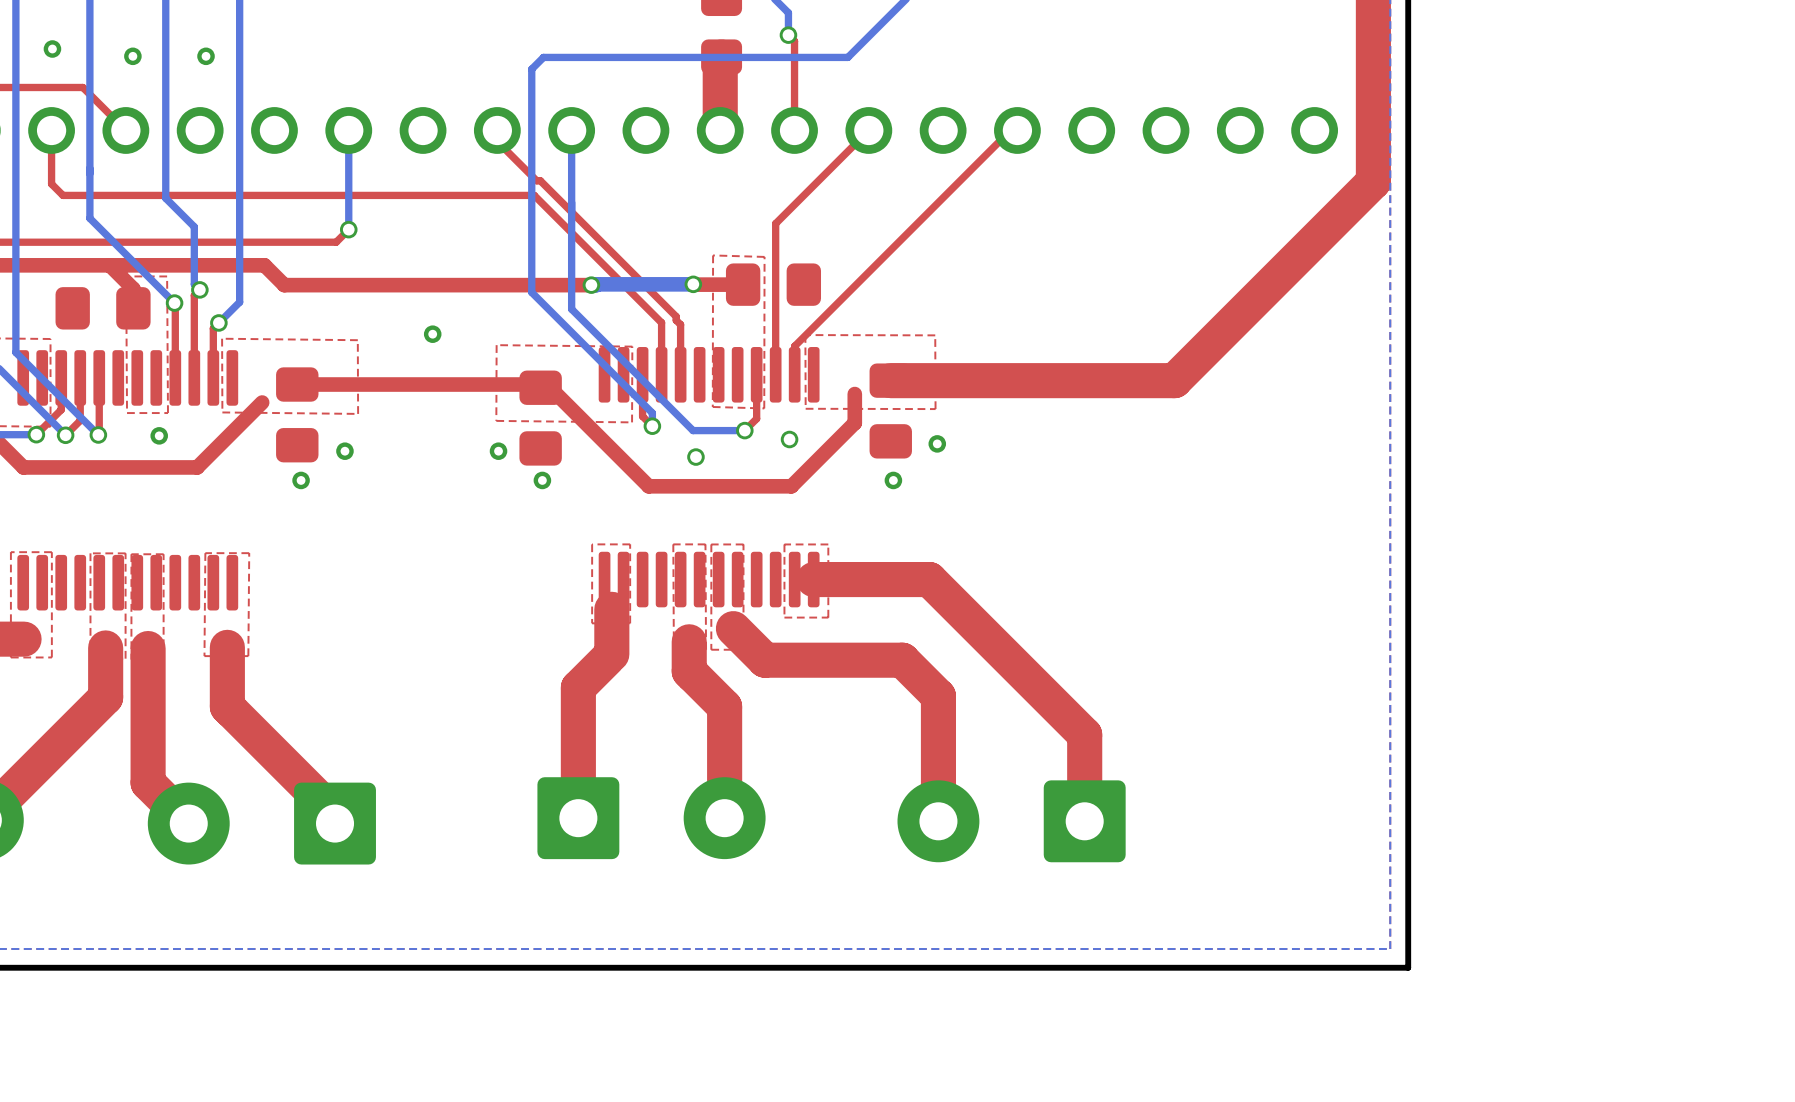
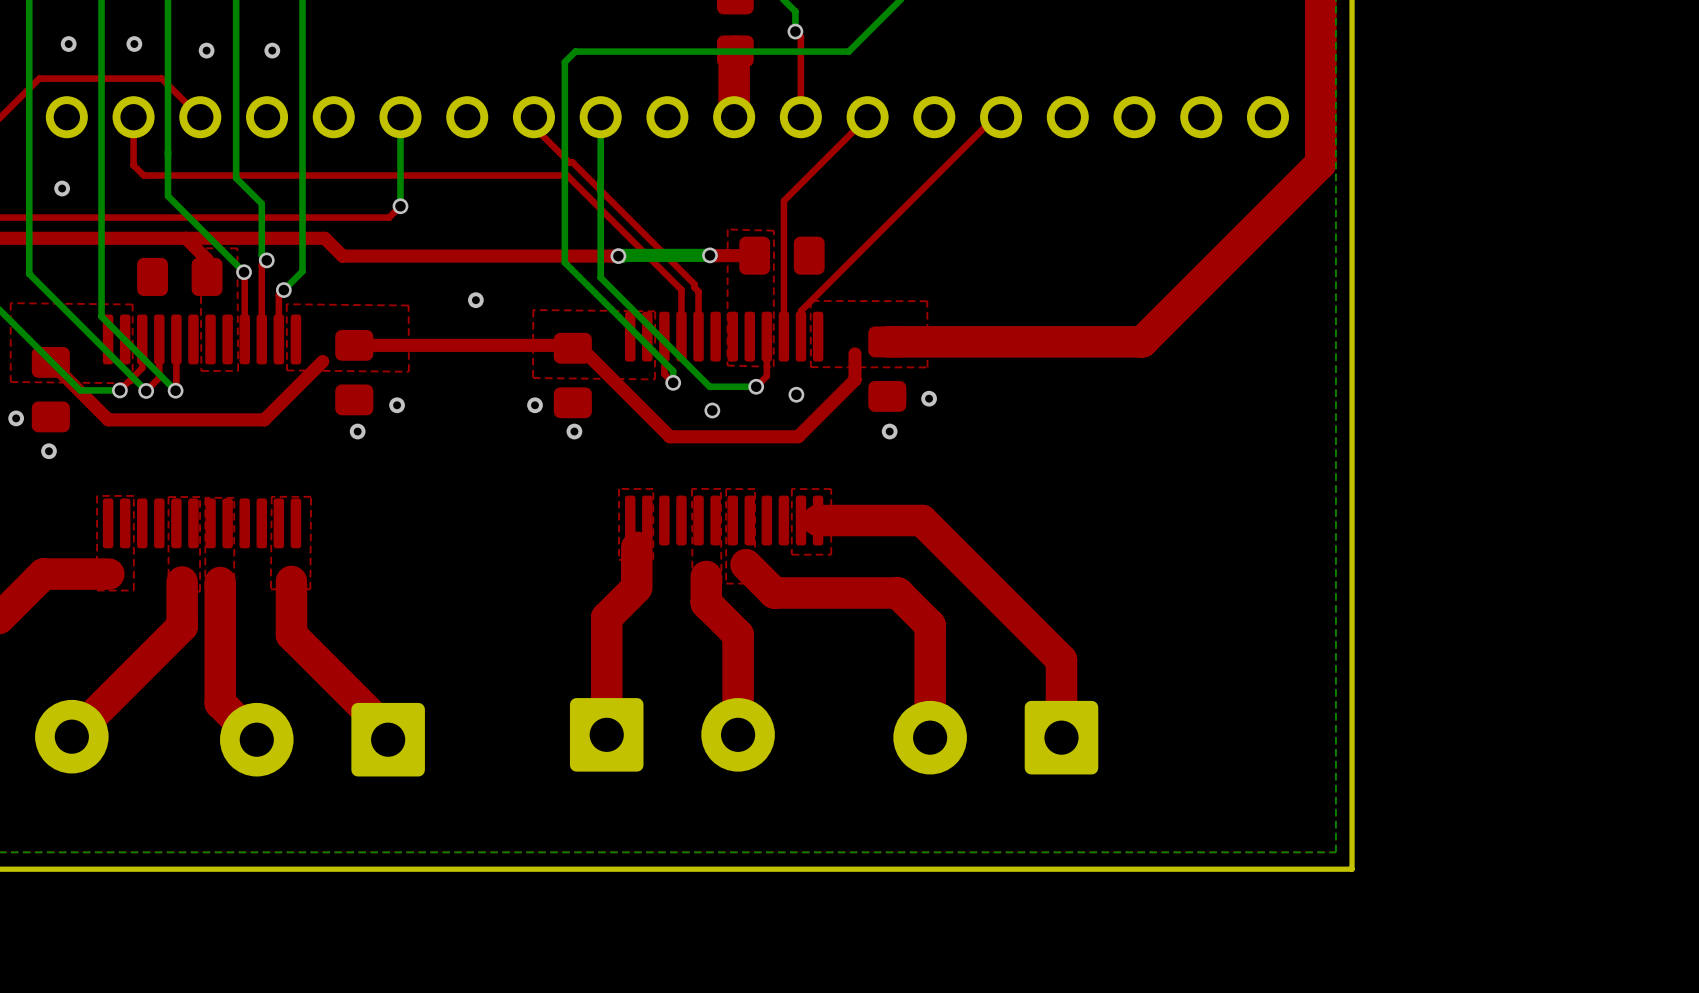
via: (159, 435) -> none

